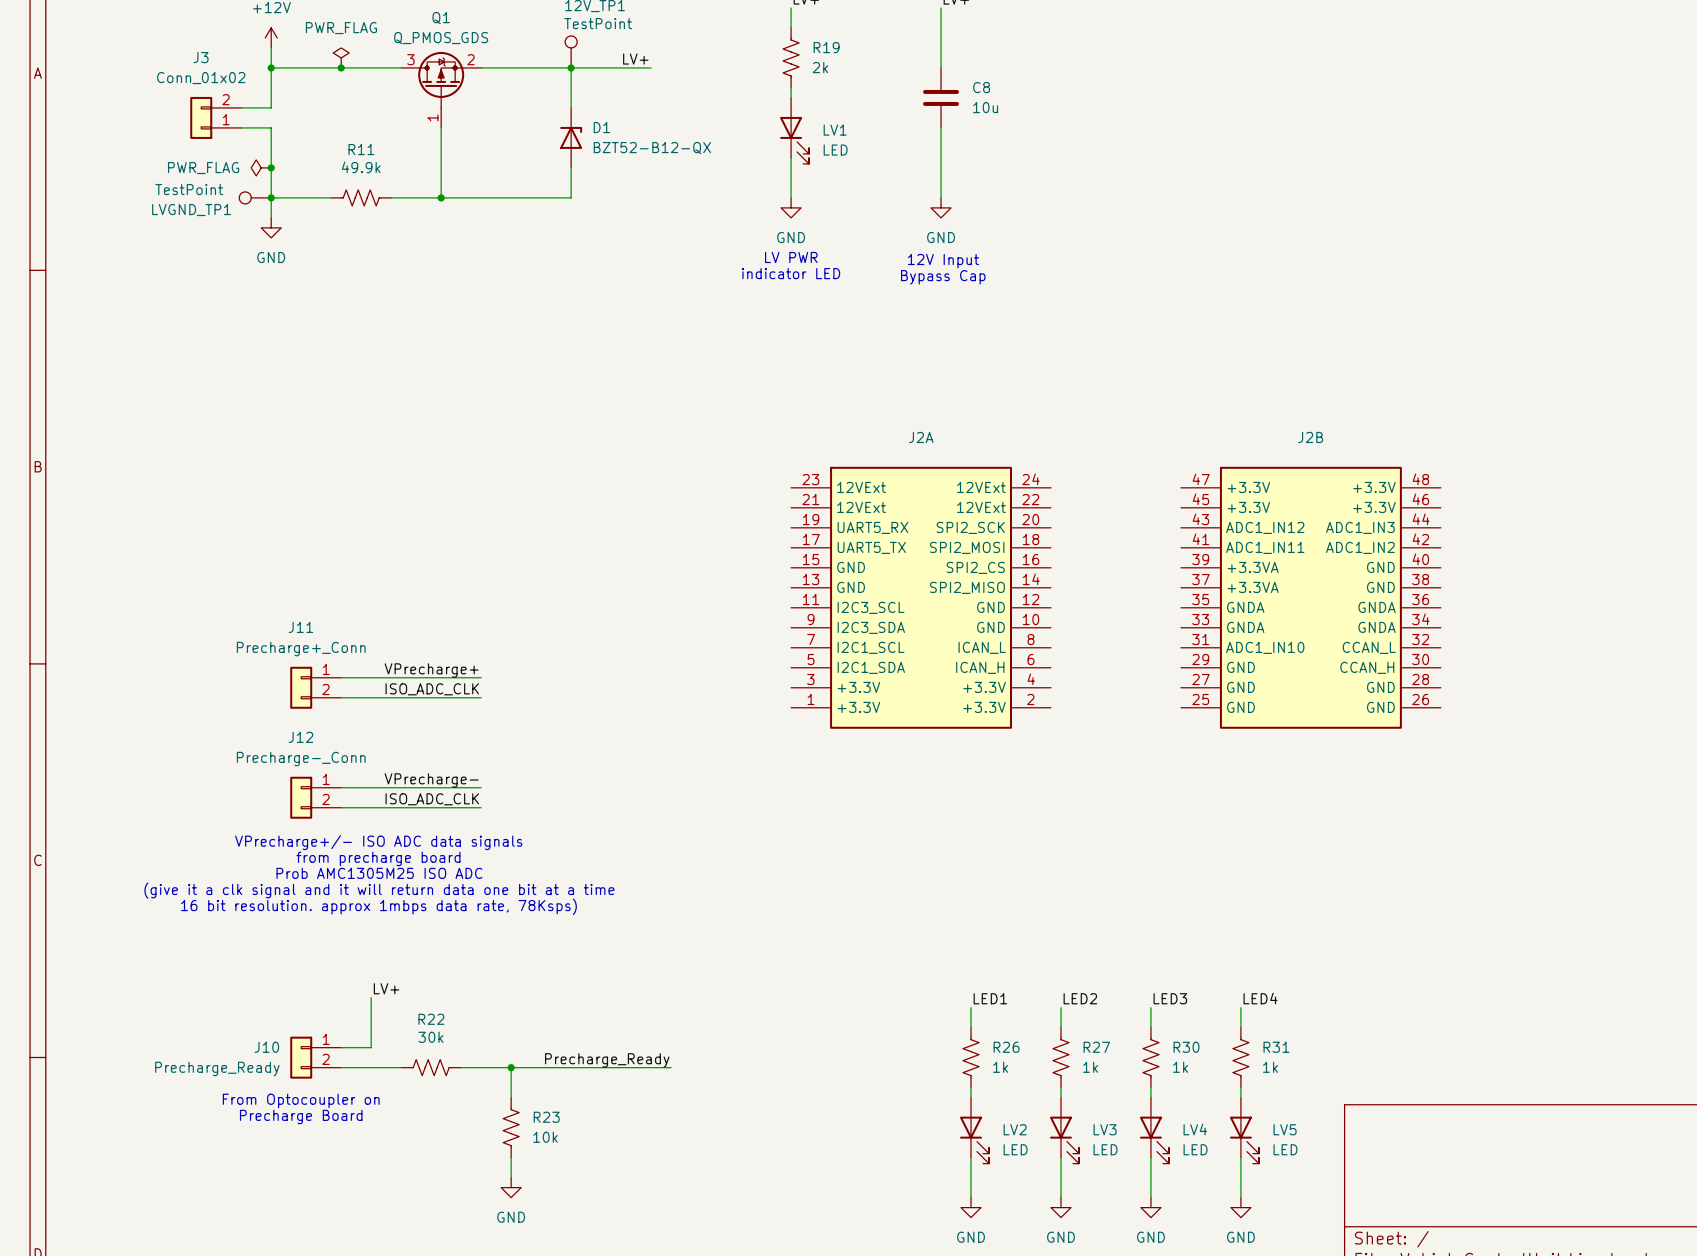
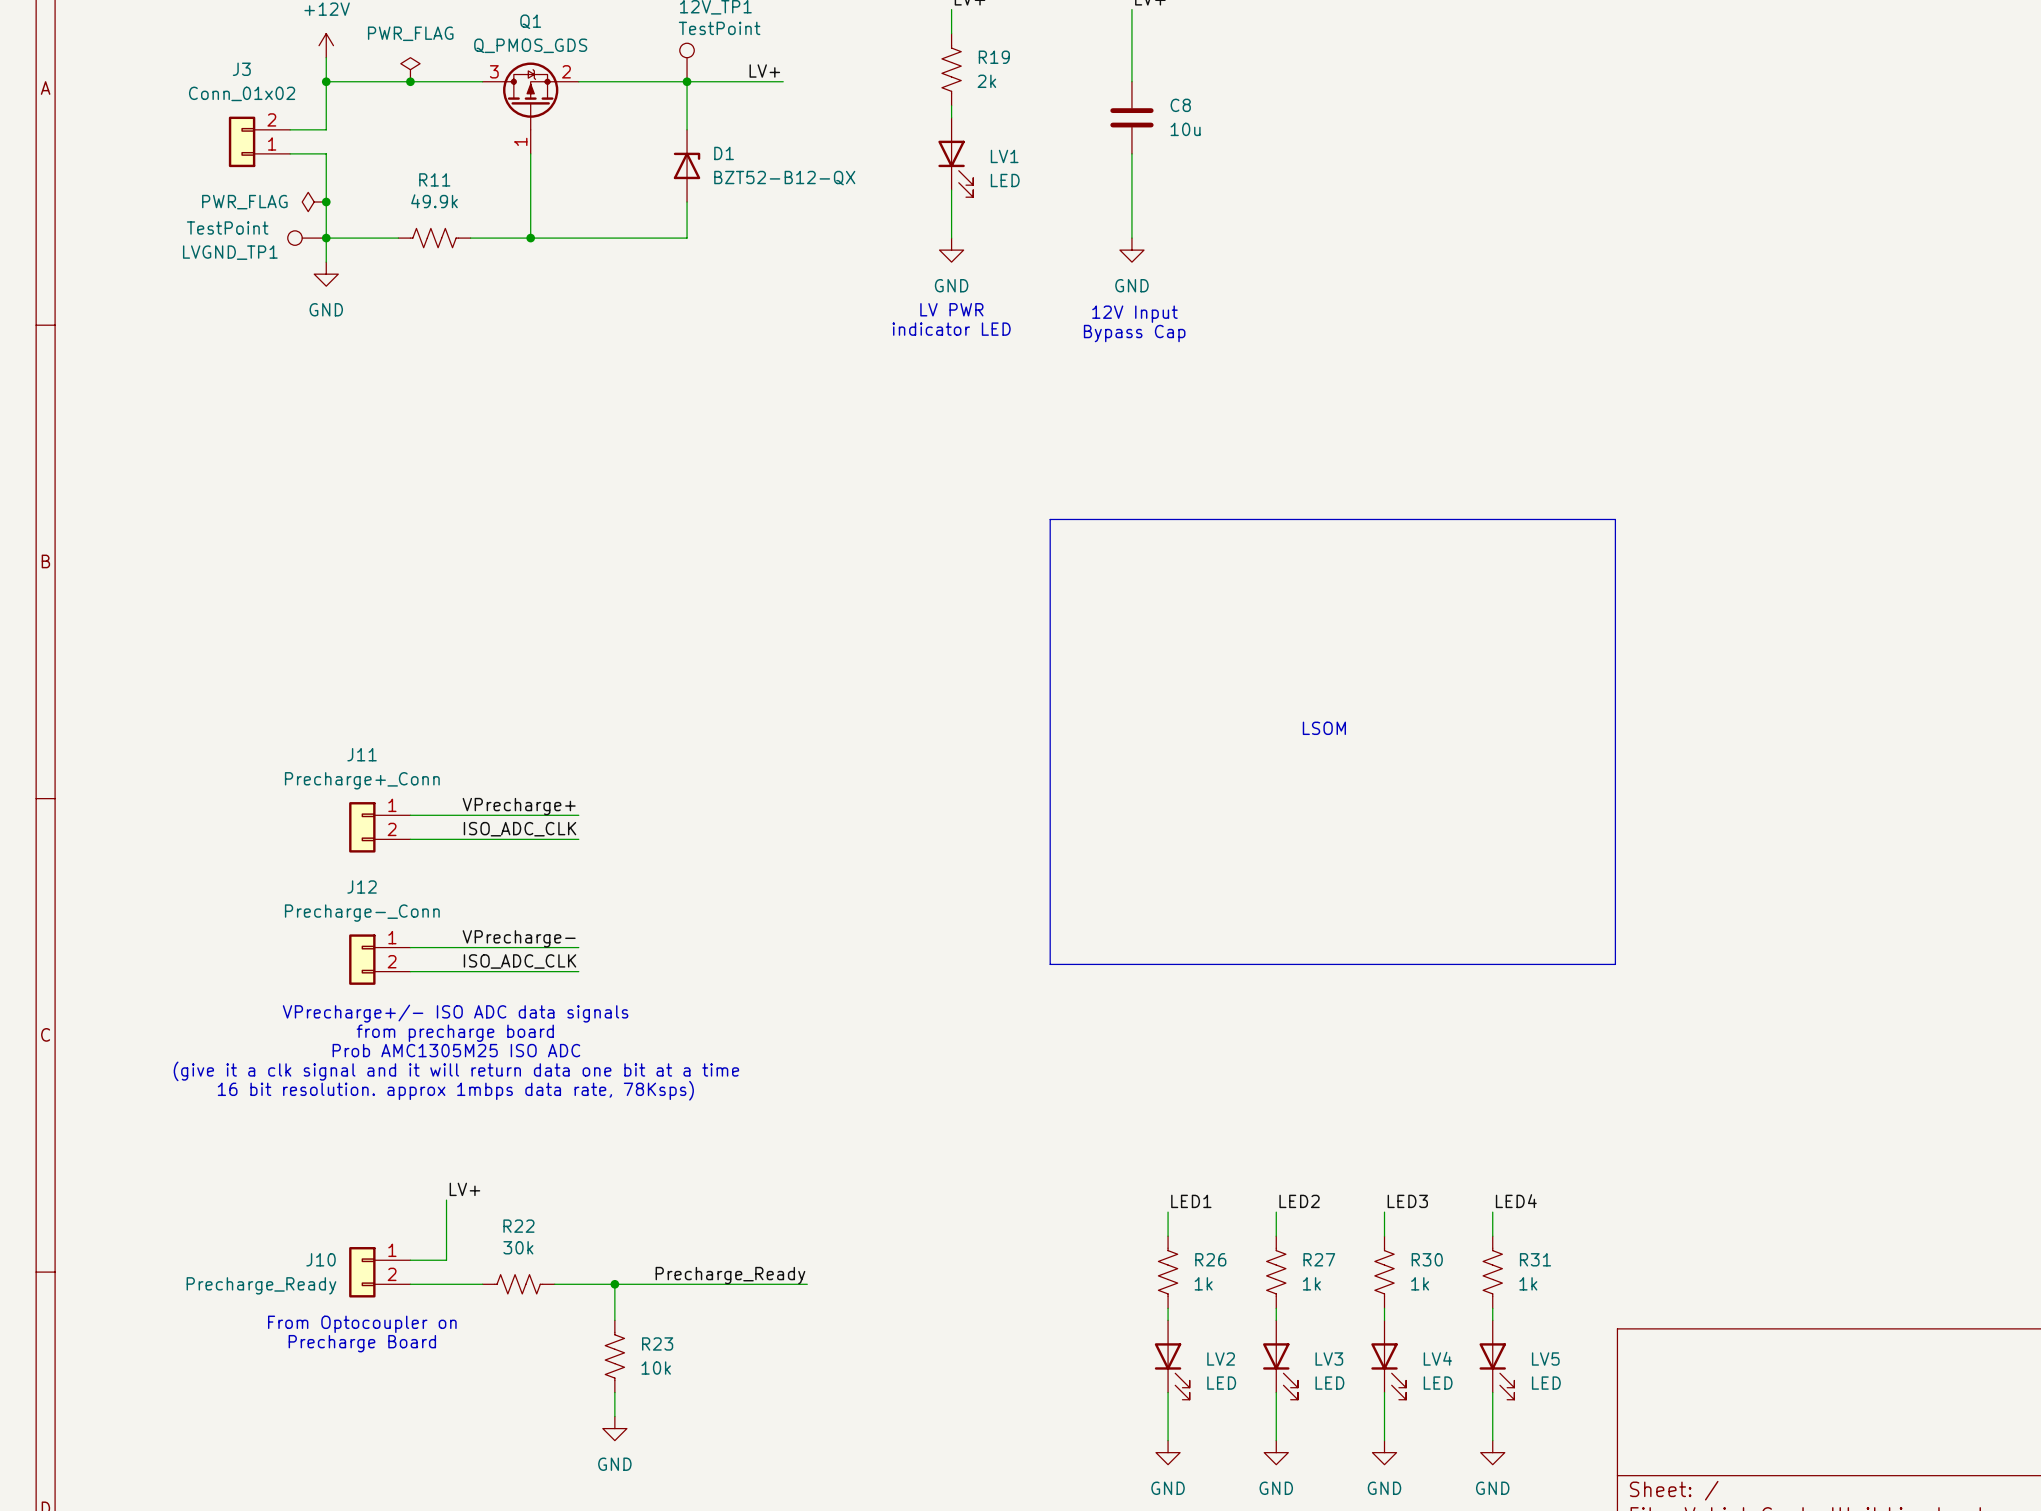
line: none -> (1050, 519) (1615, 519) (1615, 964) (1050, 964) (1050, 519)
J2A: (921, 597) -> none
J2B: (1310, 597) -> none
text: none -> LSOM (1324, 728)

